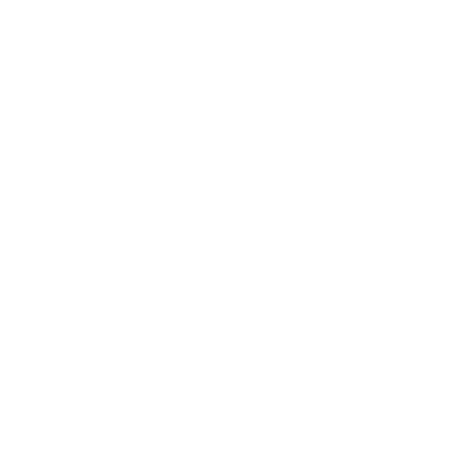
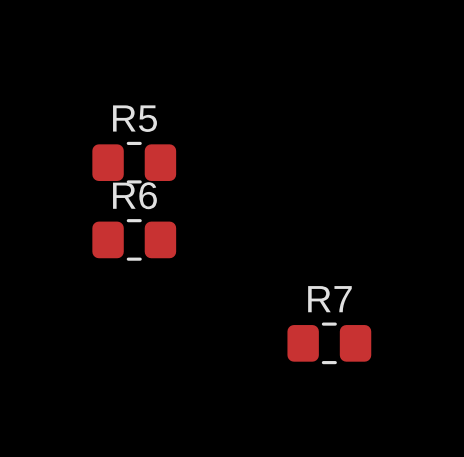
R5: none -> (134, 162)
R6: none -> (134, 239)
R7: none -> (329, 343)

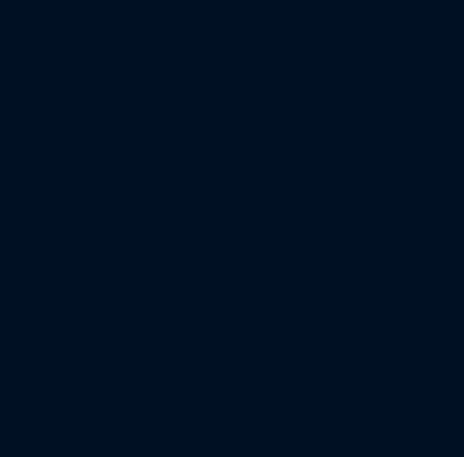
R5: (134, 162) -> none
R6: (134, 239) -> none
R7: (329, 343) -> none

